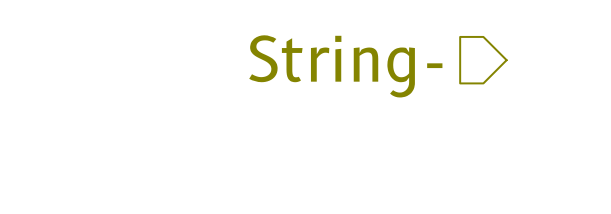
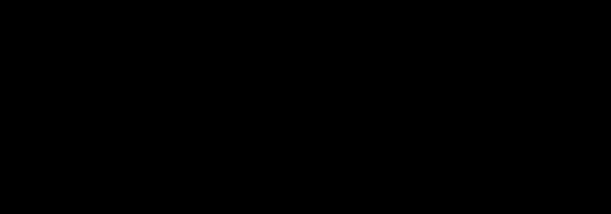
hierarchical label: String- (345, 66) -> none

